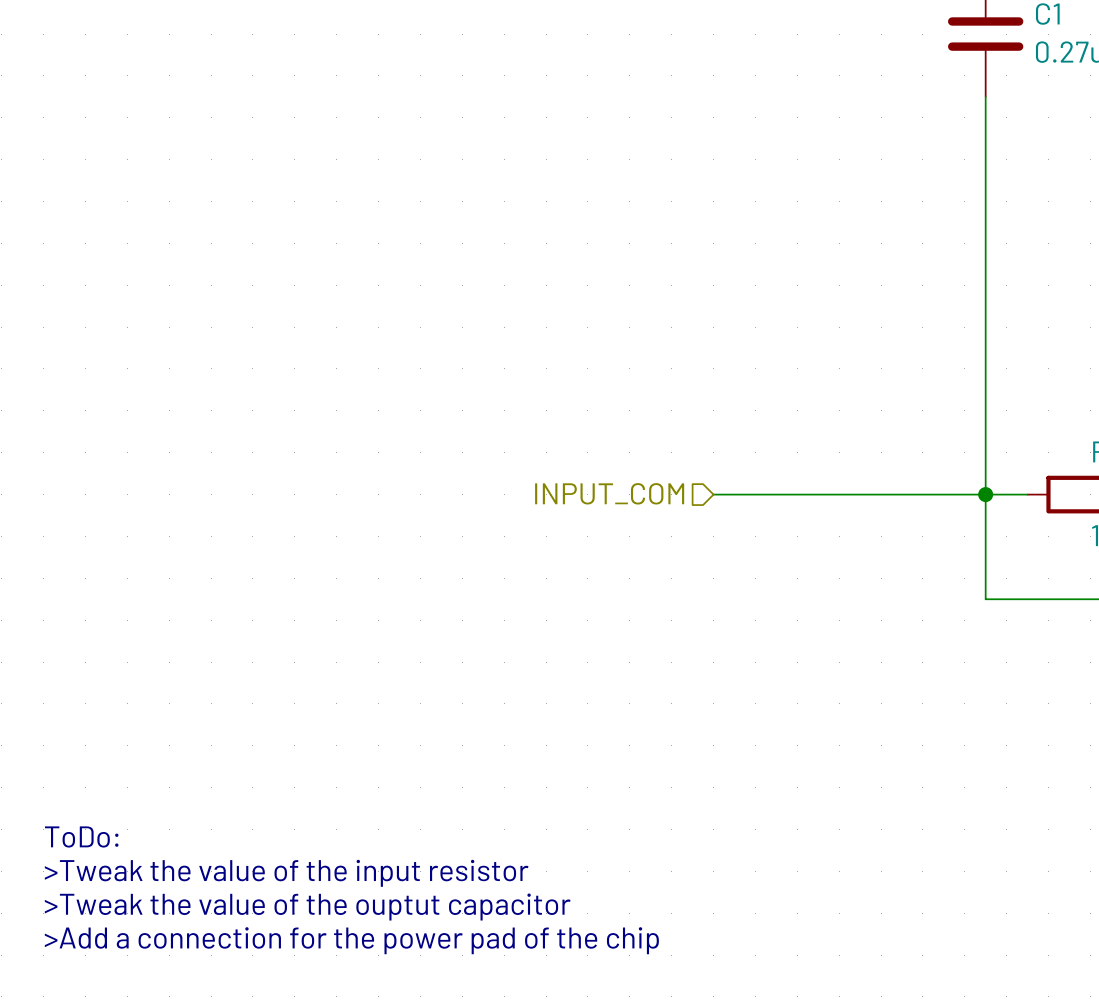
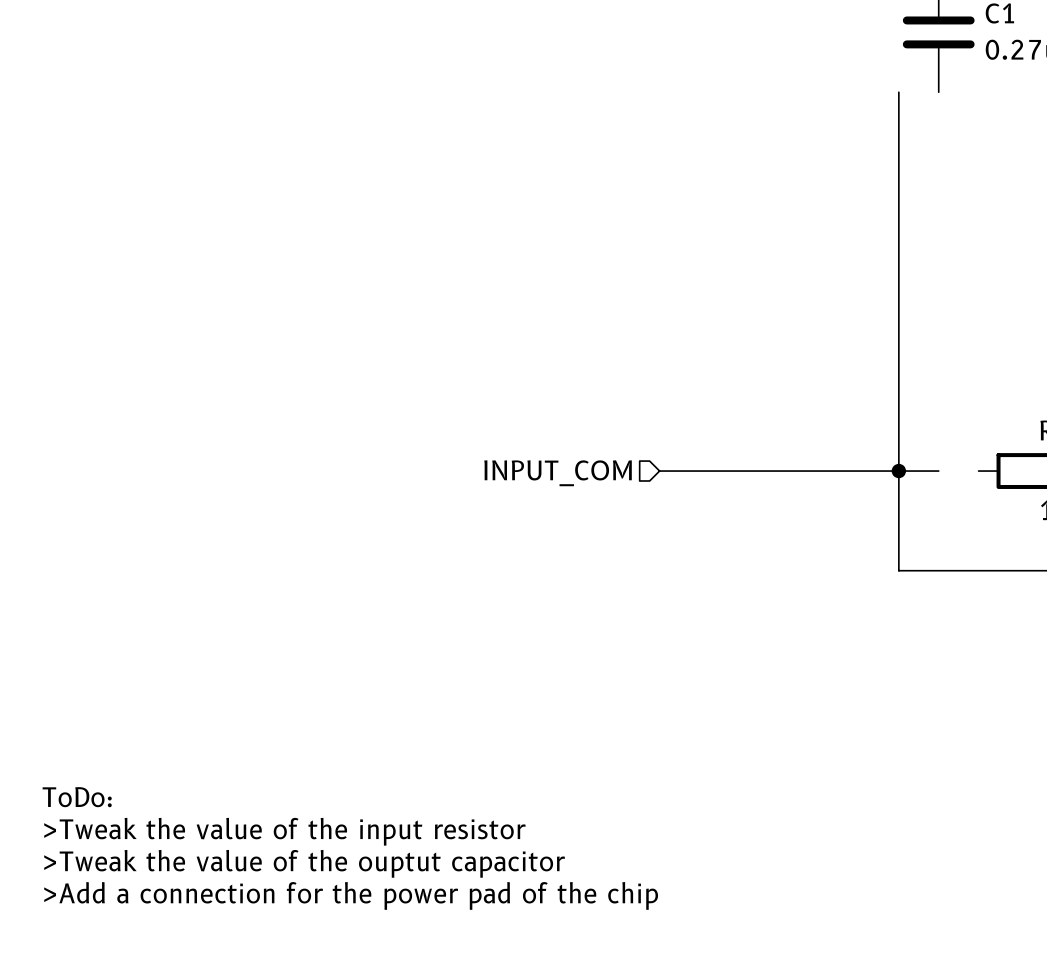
wire: (985, 96) (985, 599) -> (898, 92) (898, 570) (938, 570)
hierarchical label position: INPUT_COM (609, 493) -> INPUT_COM (558, 473)
wire: none -> (659, 471) (679, 471)
wire: (985, 494) (1027, 494) -> none
junction position: (985, 494) -> (898, 471)

